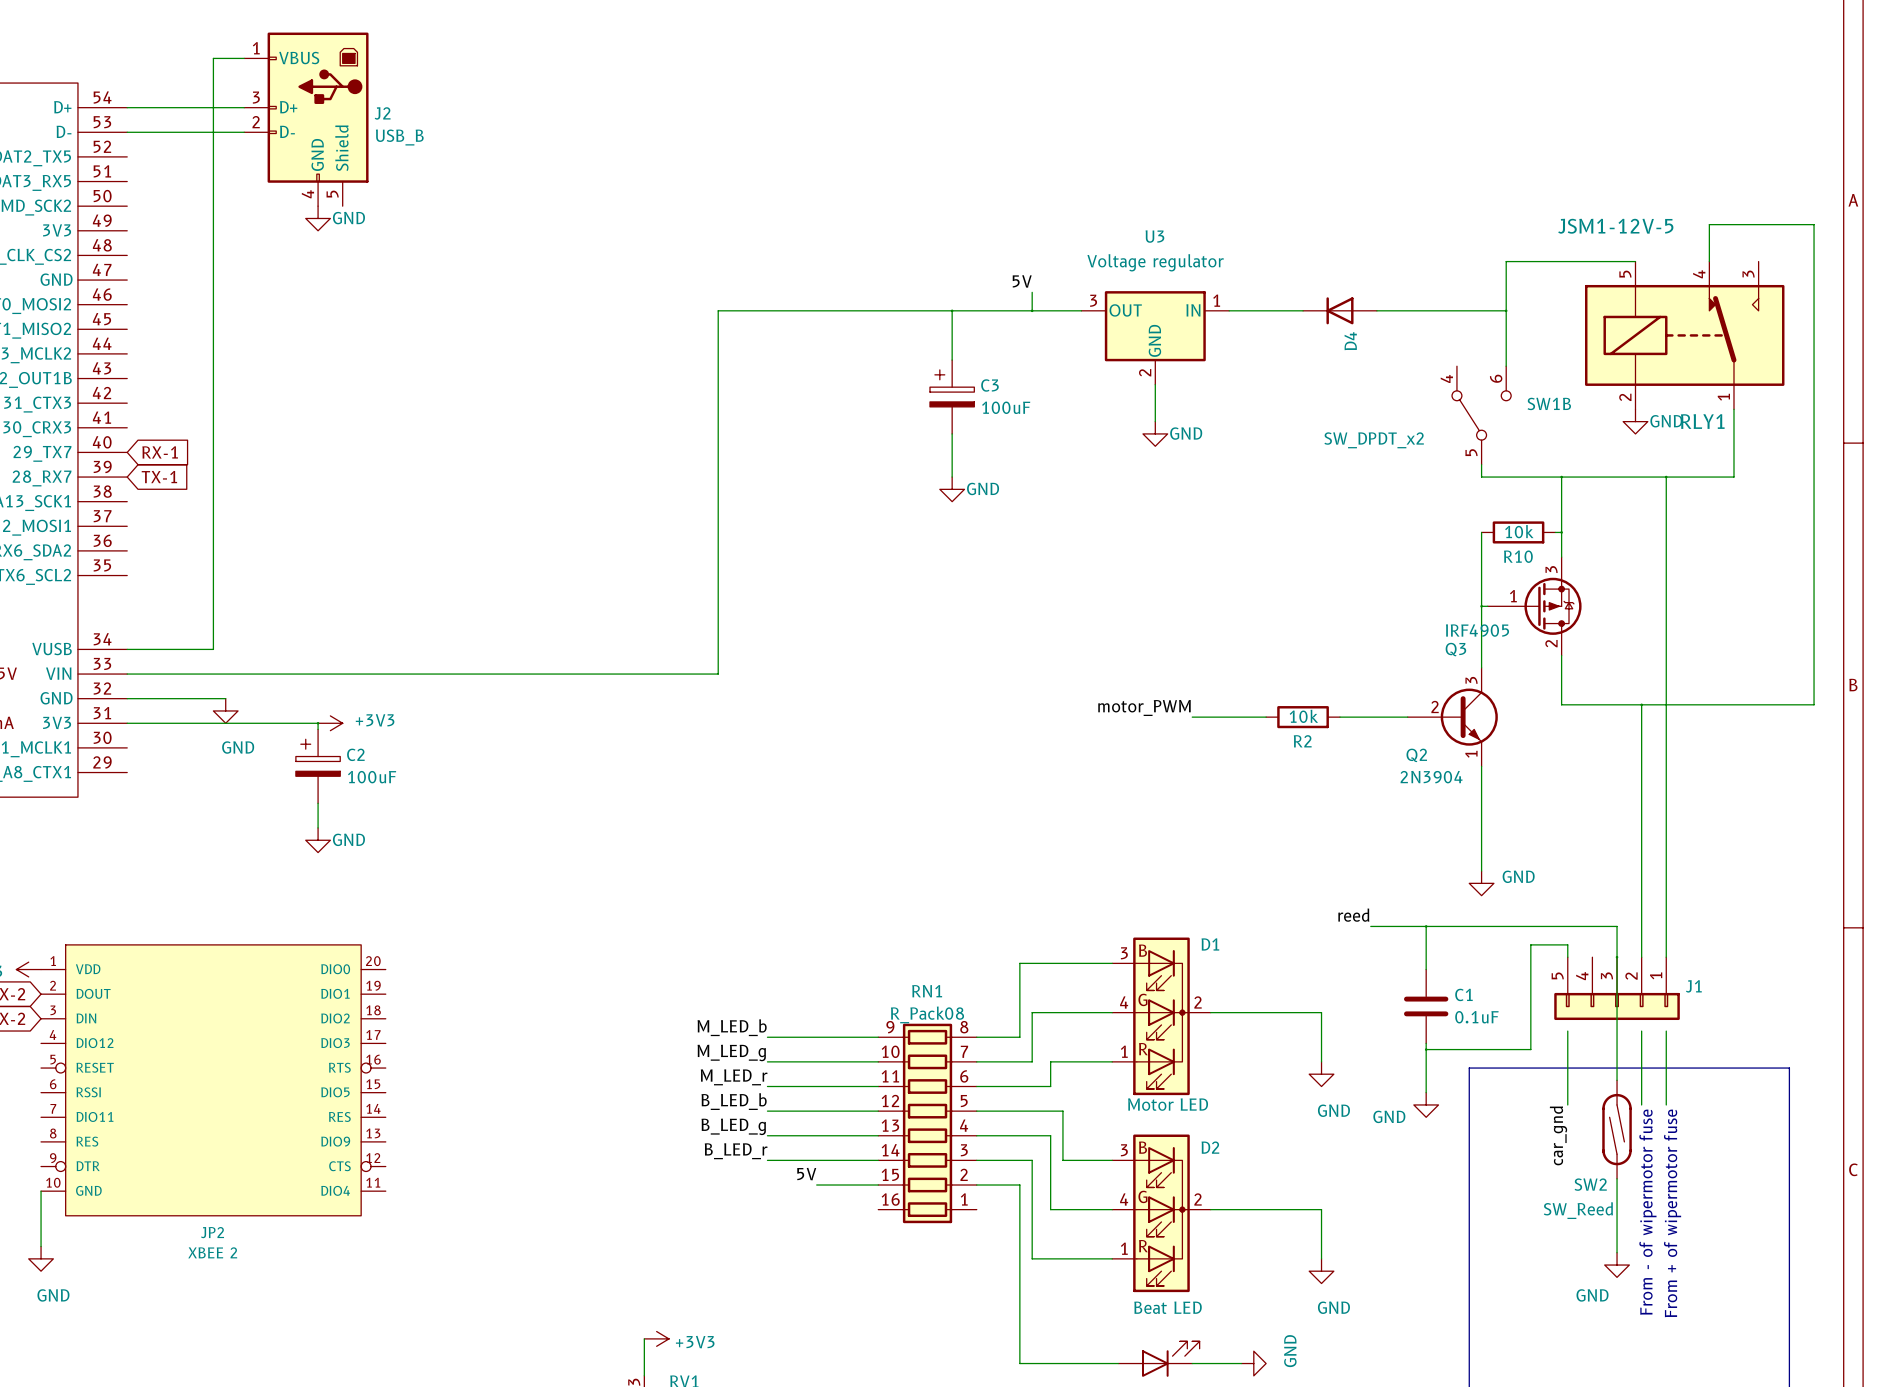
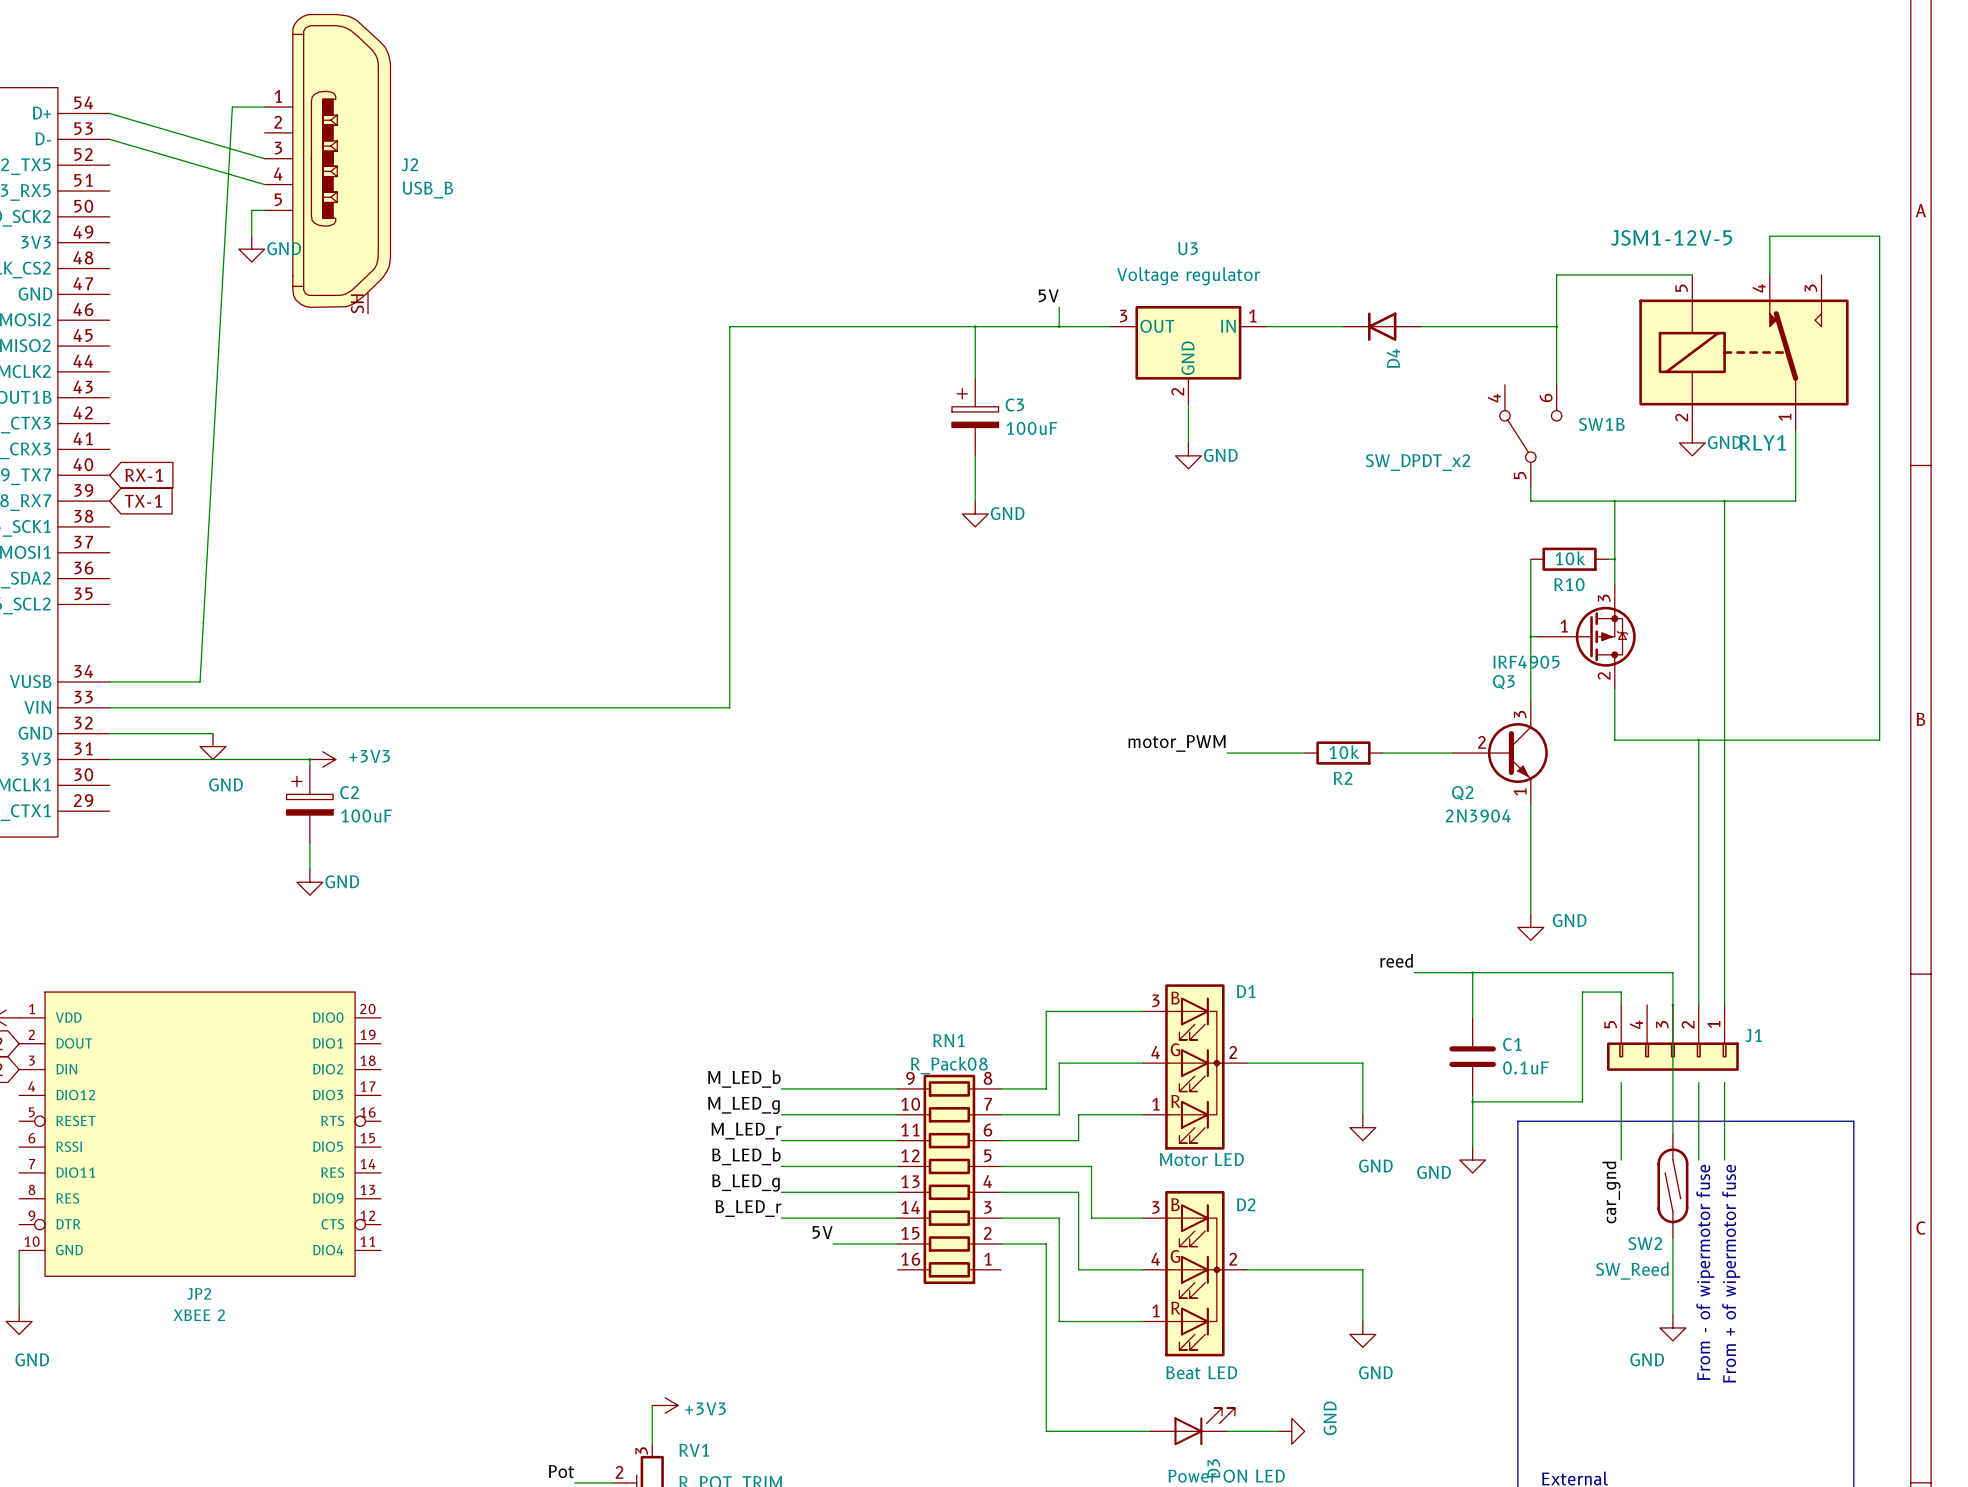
J2 symbol: [244, 32, 369, 207] -> [264, 14, 391, 314]
wire: (244, 58) (213, 58) (213, 649) -> (264, 107) (232, 107) (200, 681)
wire: (127, 107) (244, 107) -> (109, 113) (264, 158)
wire: (127, 132) (244, 132) -> (109, 139) (264, 184)
wire: none -> (264, 210) (251, 210) (251, 236)
power symbol position: GND (318, 218) -> GND (251, 249)

